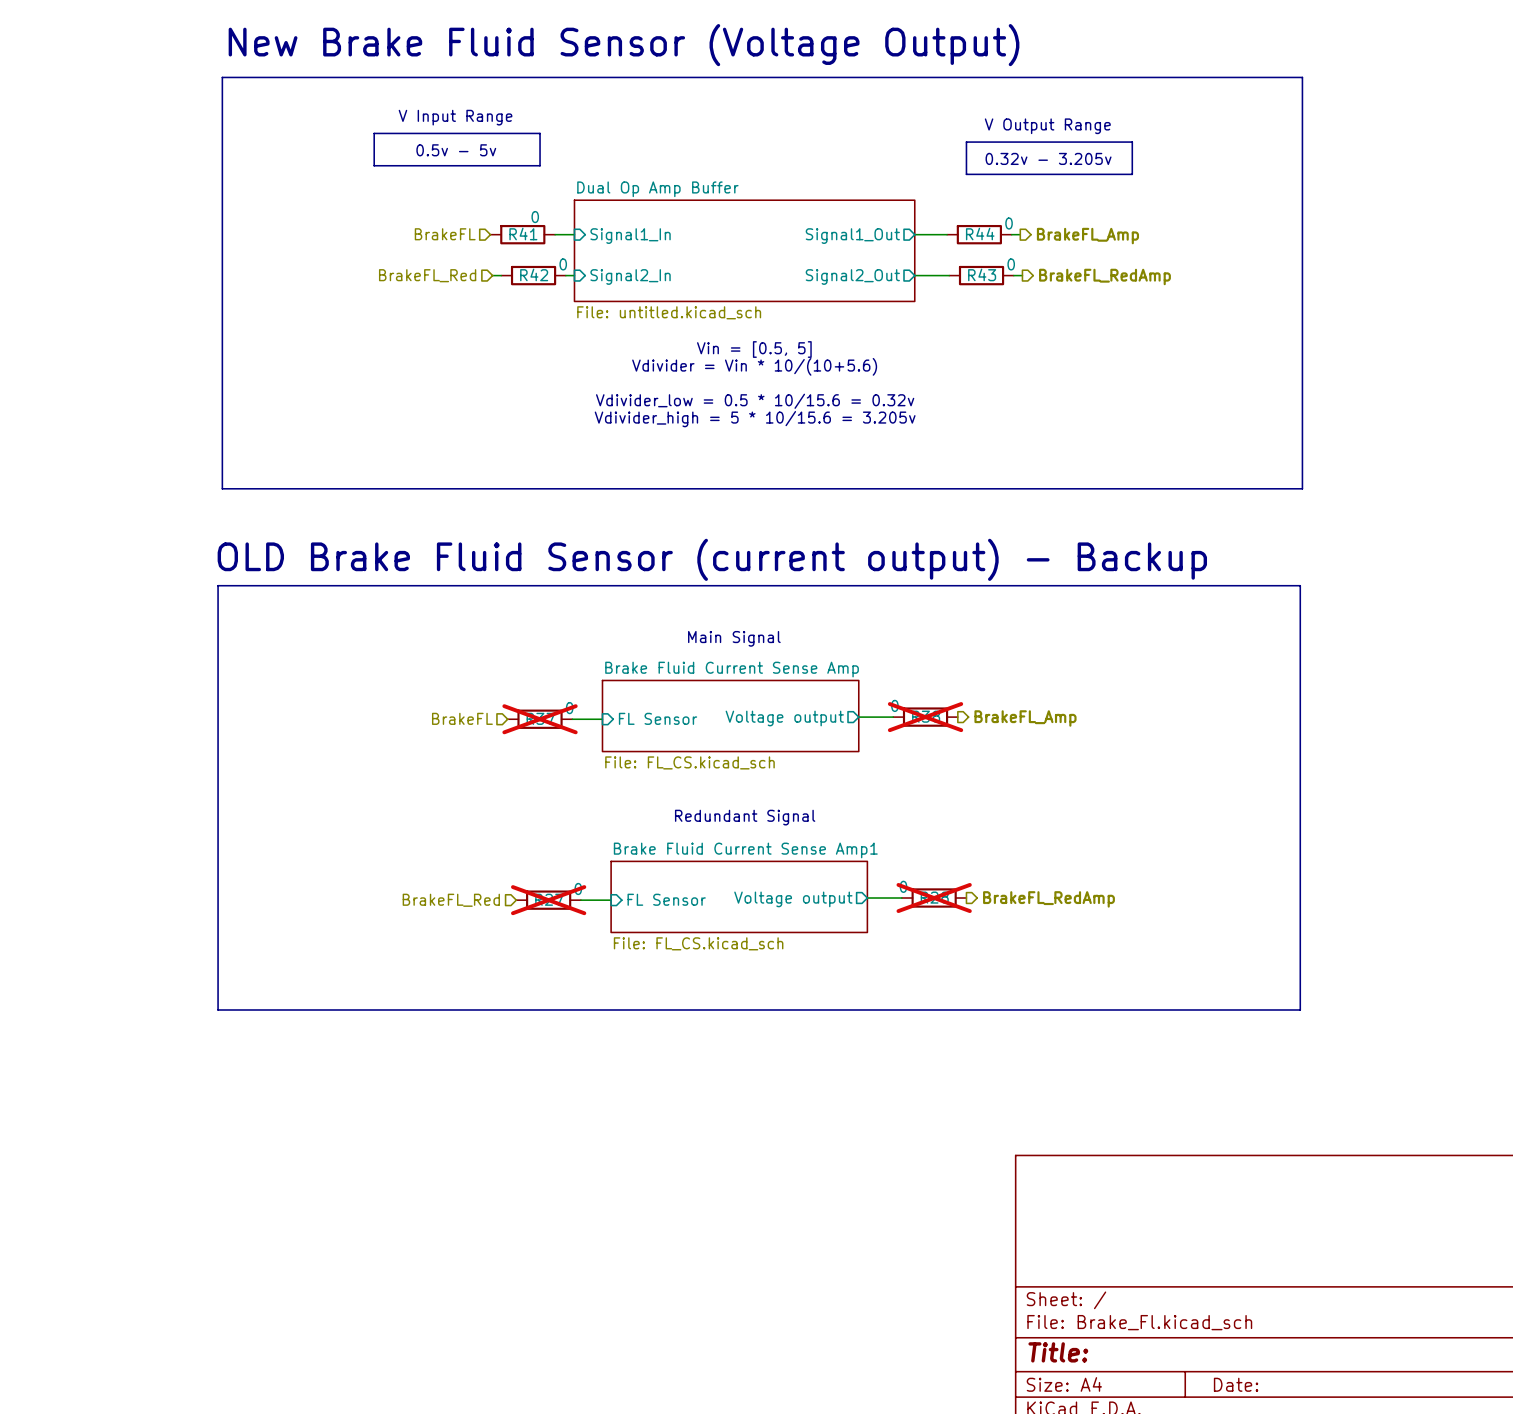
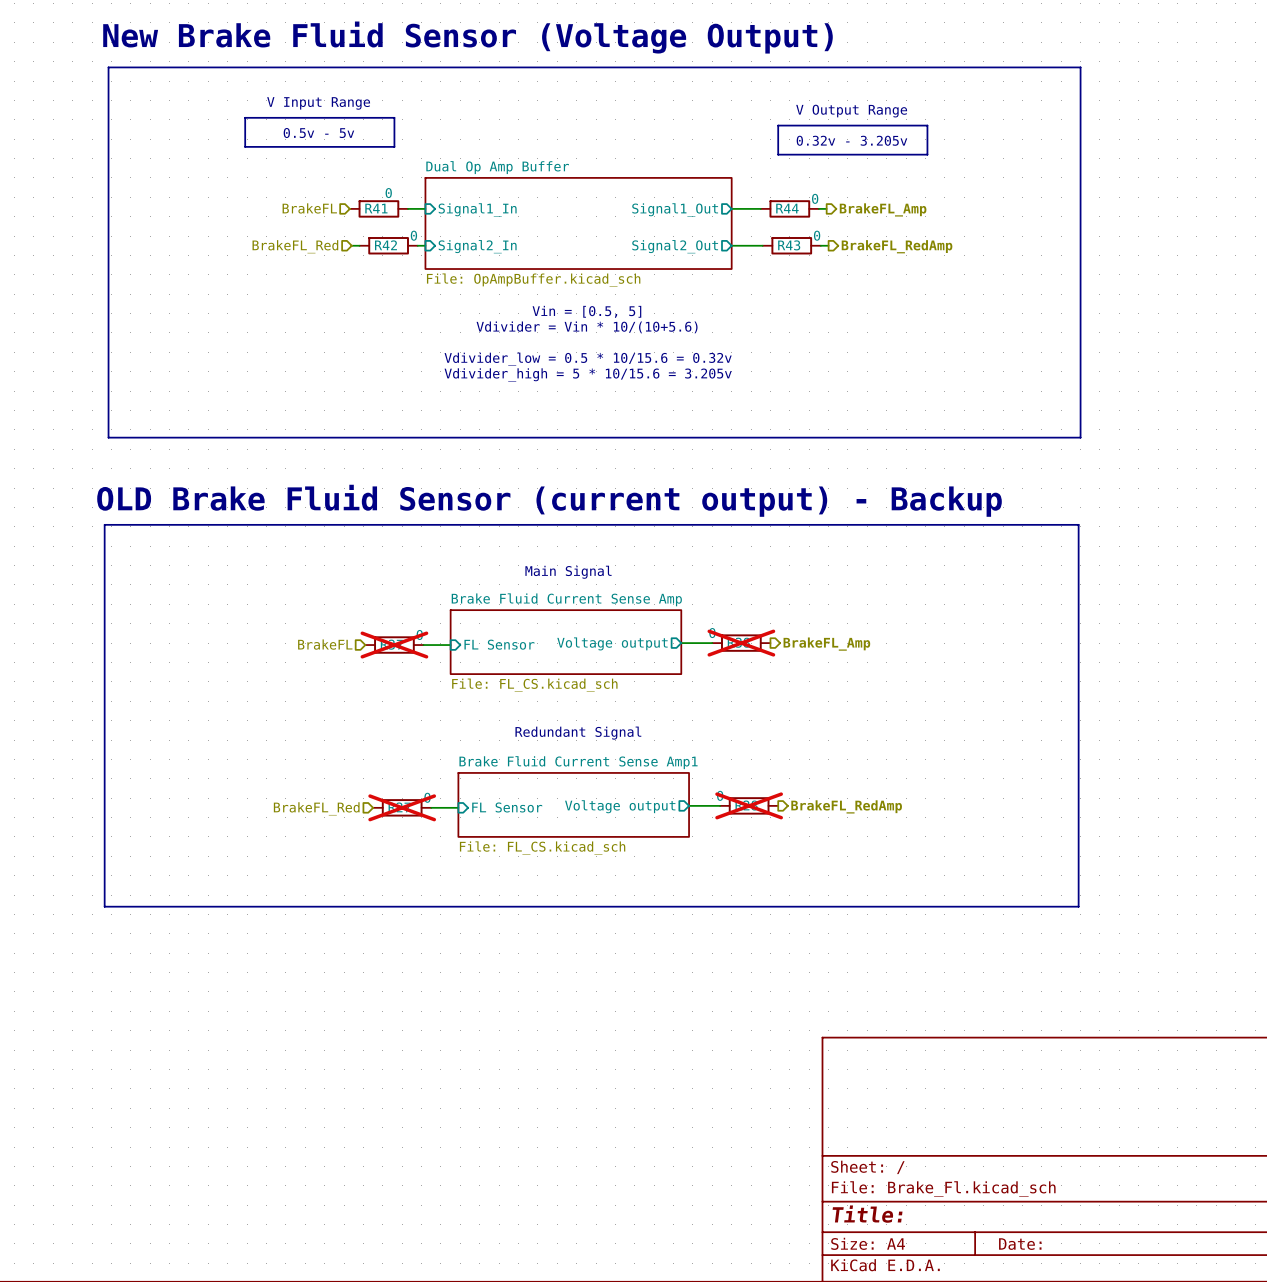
sheet Dual Op Amp Buffer value: File: untitled.kicad_sch (669, 312) -> File: OpAmpBuffer.kicad_sch (533, 280)

